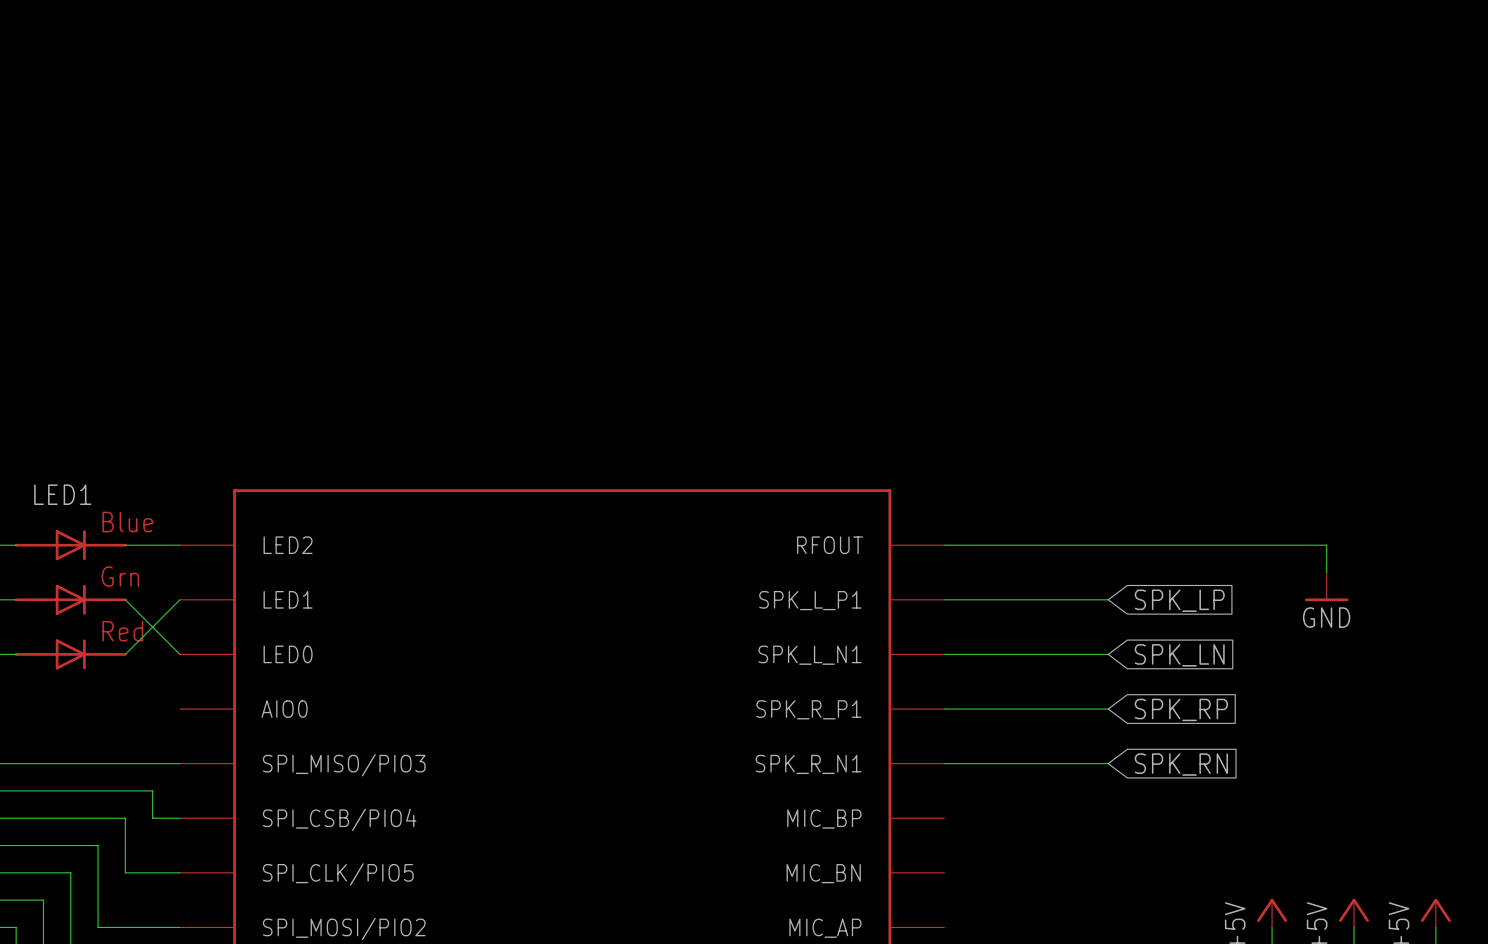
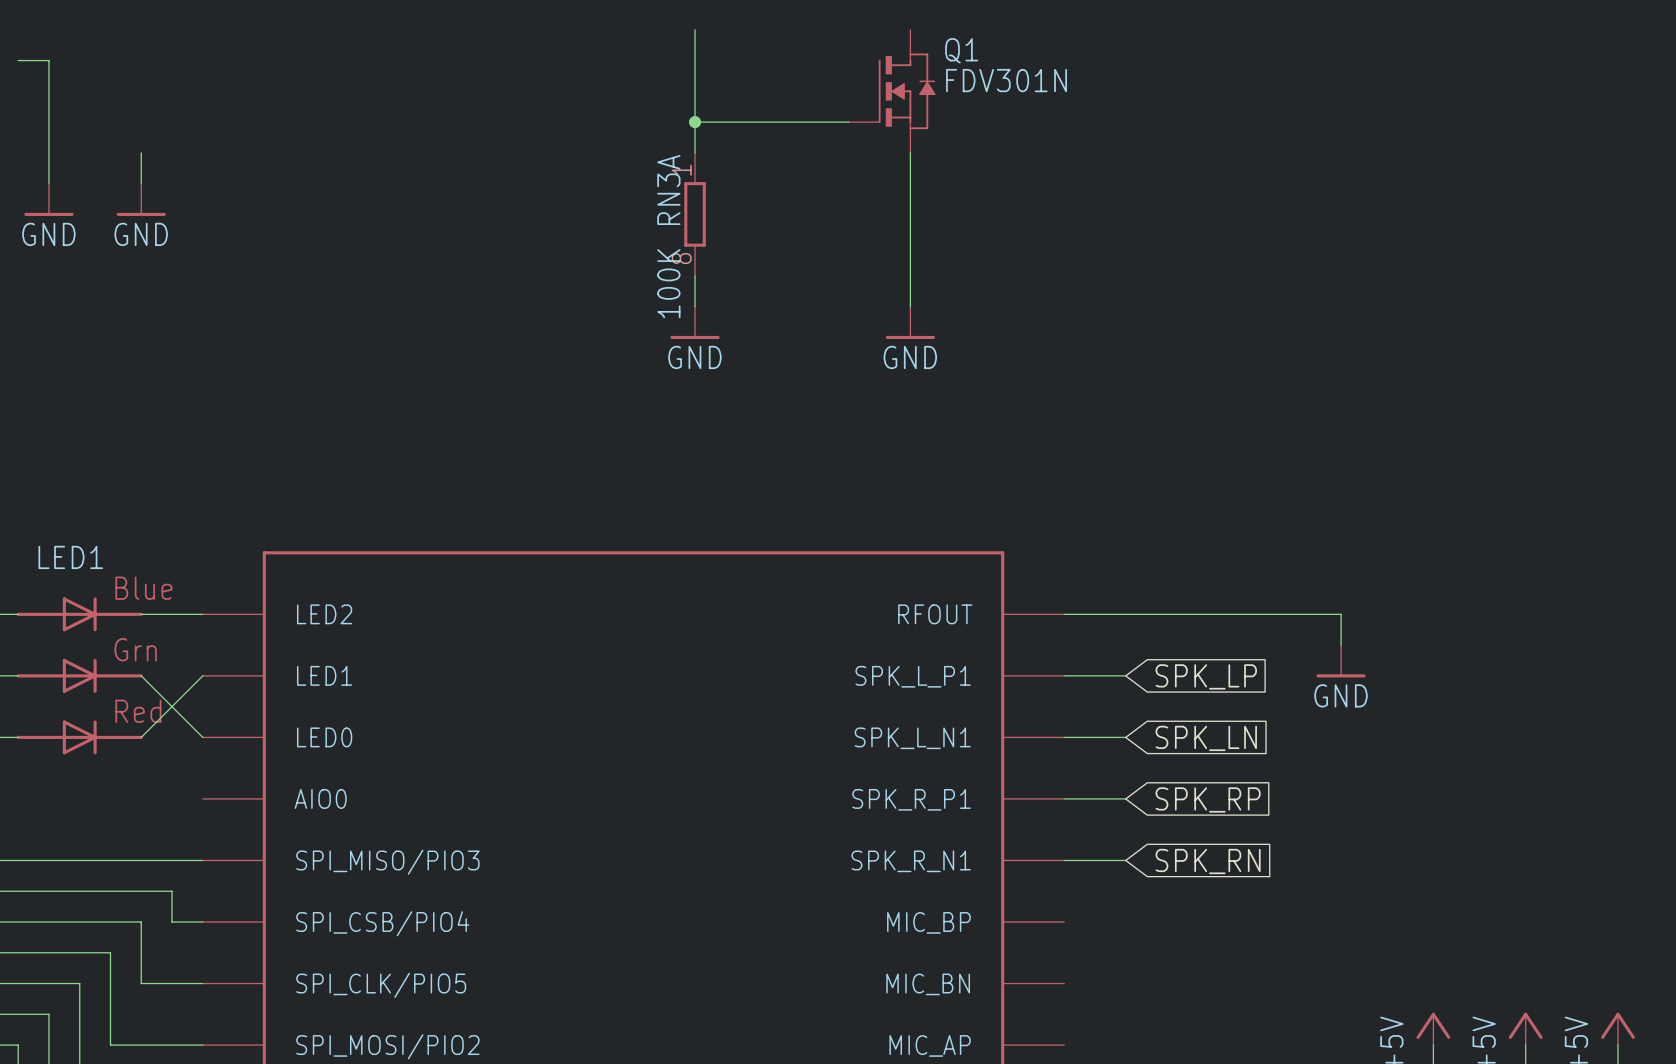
wire: none -> (695, 29) (695, 152)
wire: none -> (18, 60) (48, 60) (48, 183)
Q1: none -> FDV301N (892, 91)
wire: none -> (695, 122) (848, 122)
junction: none -> (695, 122)
wire: none -> (141, 152) (141, 183)
wire: none -> (910, 152) (910, 306)
power symbol: none -> GND (48, 199)
power symbol: none -> GND (141, 199)
RN3A: none -> 100K (695, 214)
wire: none -> (695, 275) (695, 306)
power symbol: none -> GND (695, 322)
power symbol: none -> GND (910, 322)
wire: (1190, 545) (1326, 545) (1326, 572) -> (1341, 614) (1341, 645)
power symbol position: GND (1326, 586) -> GND (1341, 661)
wire: (999, 599) (1108, 599) -> none
global label position: SPK_LP (1179, 600) -> SPK_LP (1206, 676)
wire: (999, 654) (1108, 654) -> none
global label position: SPK_LN (1179, 655) -> SPK_LN (1206, 738)
wire: (999, 709) (1108, 709) -> none
global label position: SPK_RP (1181, 709) -> SPK_RP (1208, 799)
wire: (999, 763) (1108, 763) -> none
global label position: SPK_RN (1181, 764) -> SPK_RN (1208, 861)

